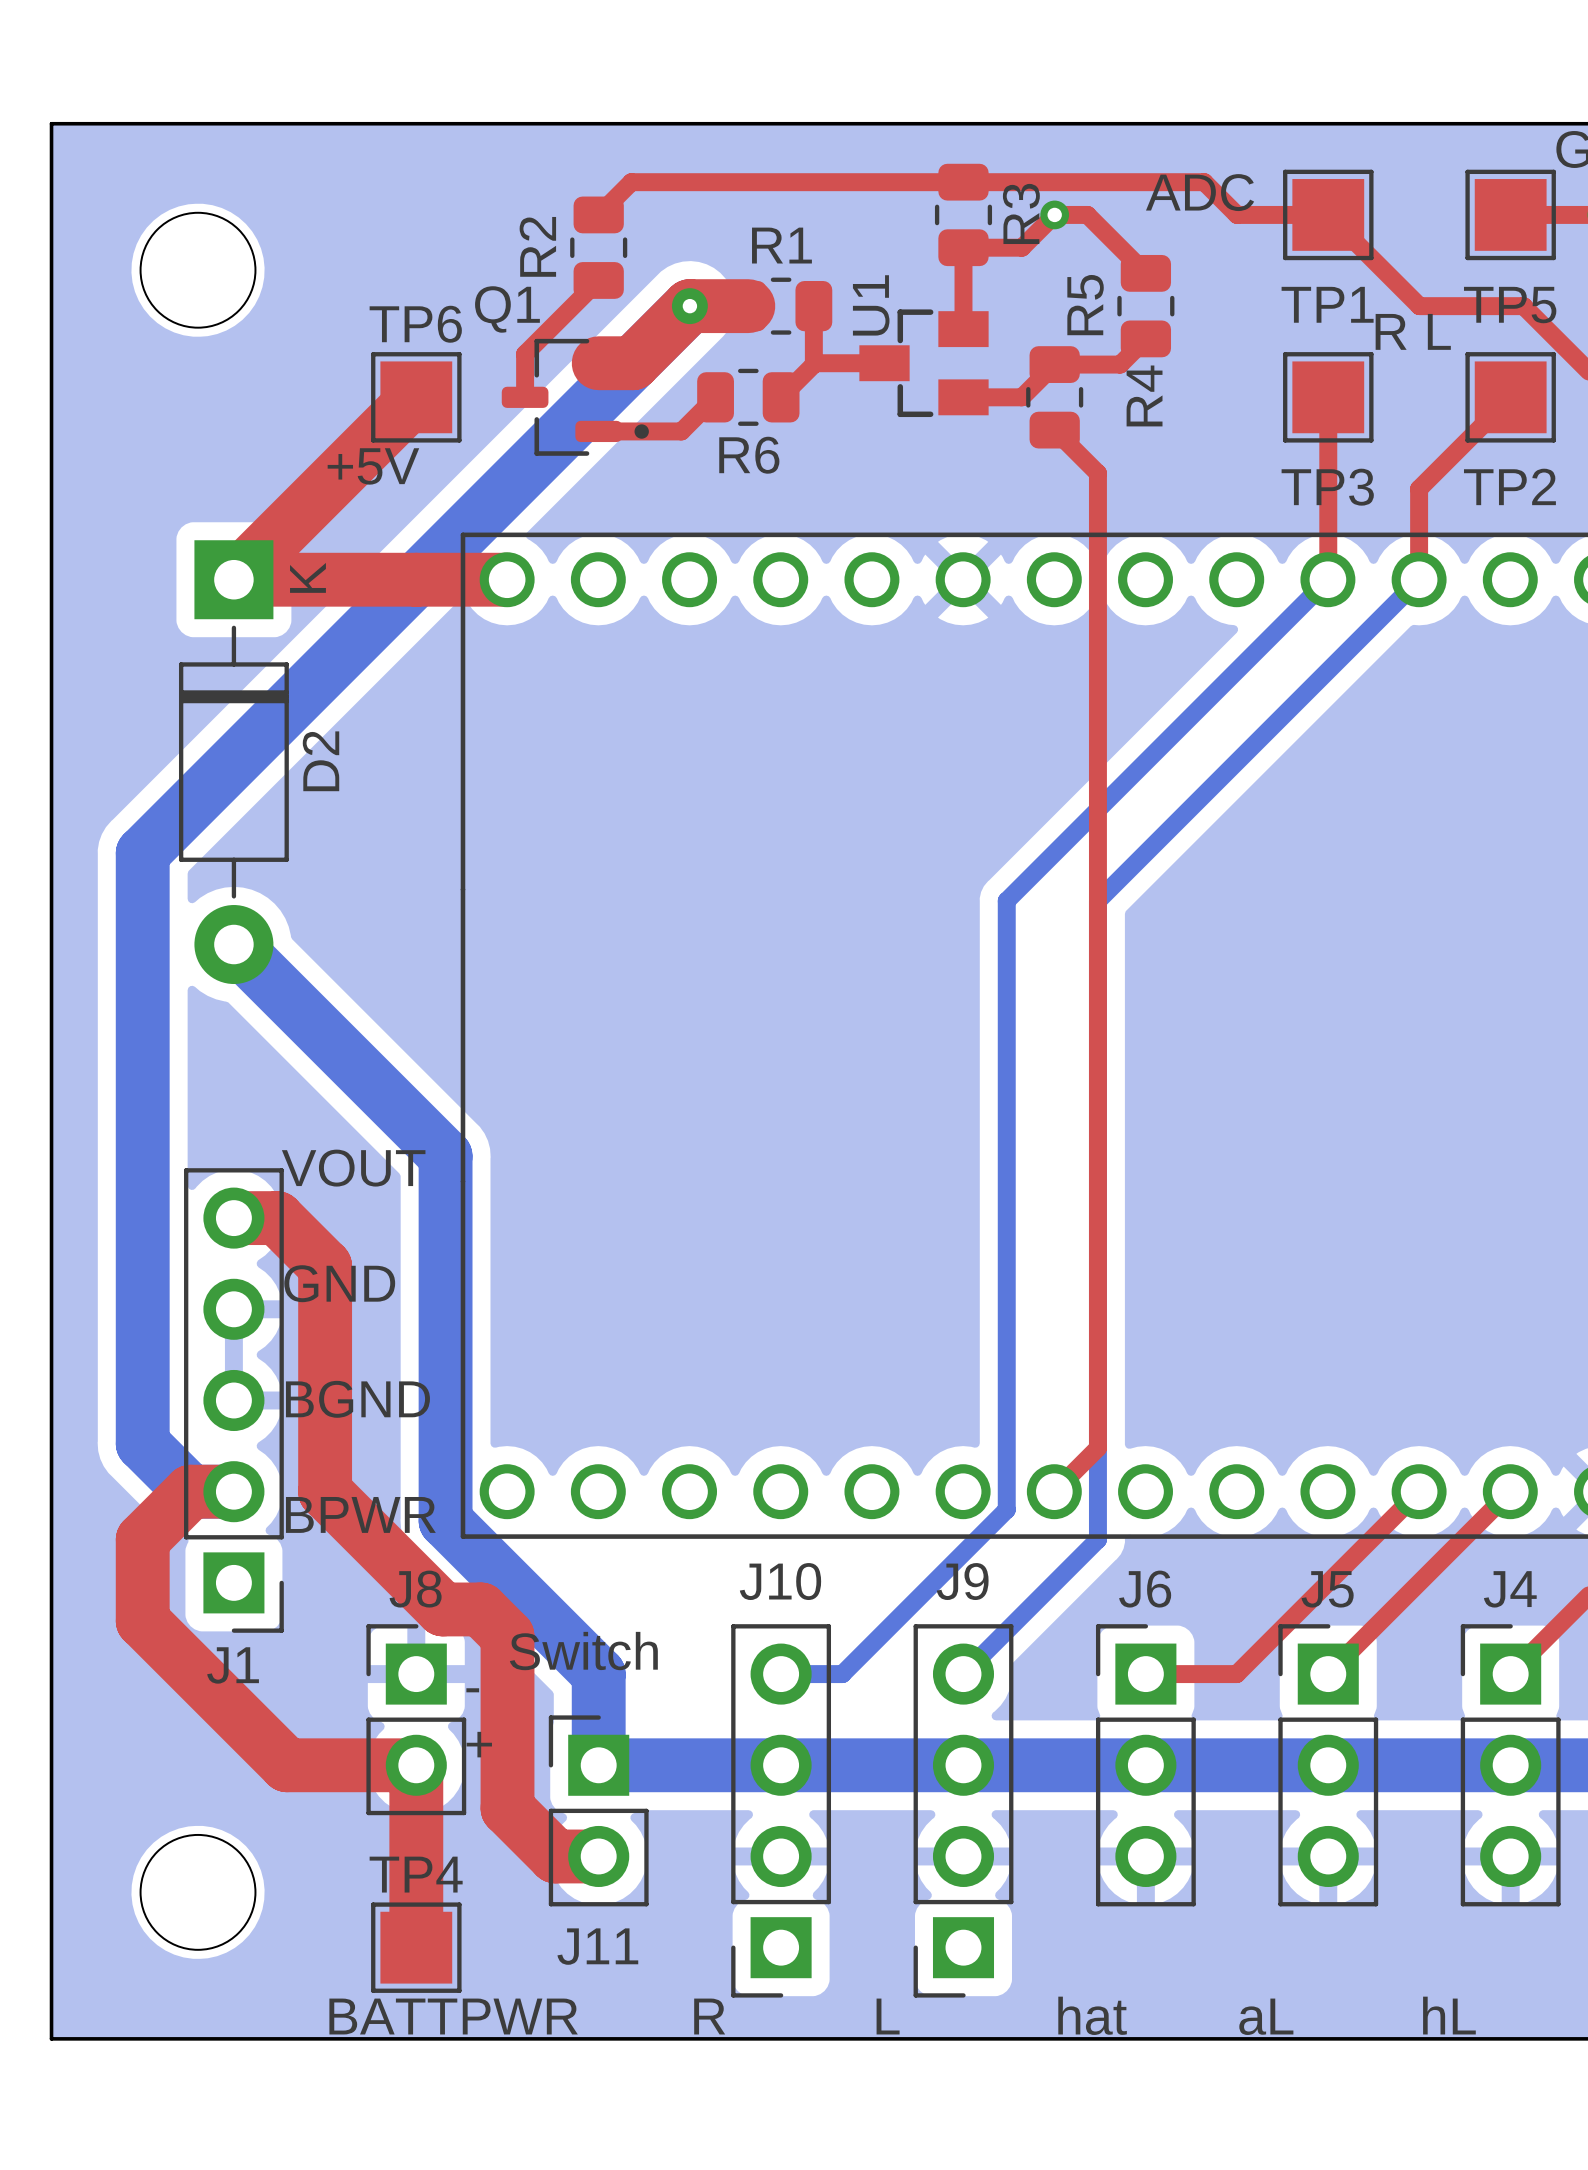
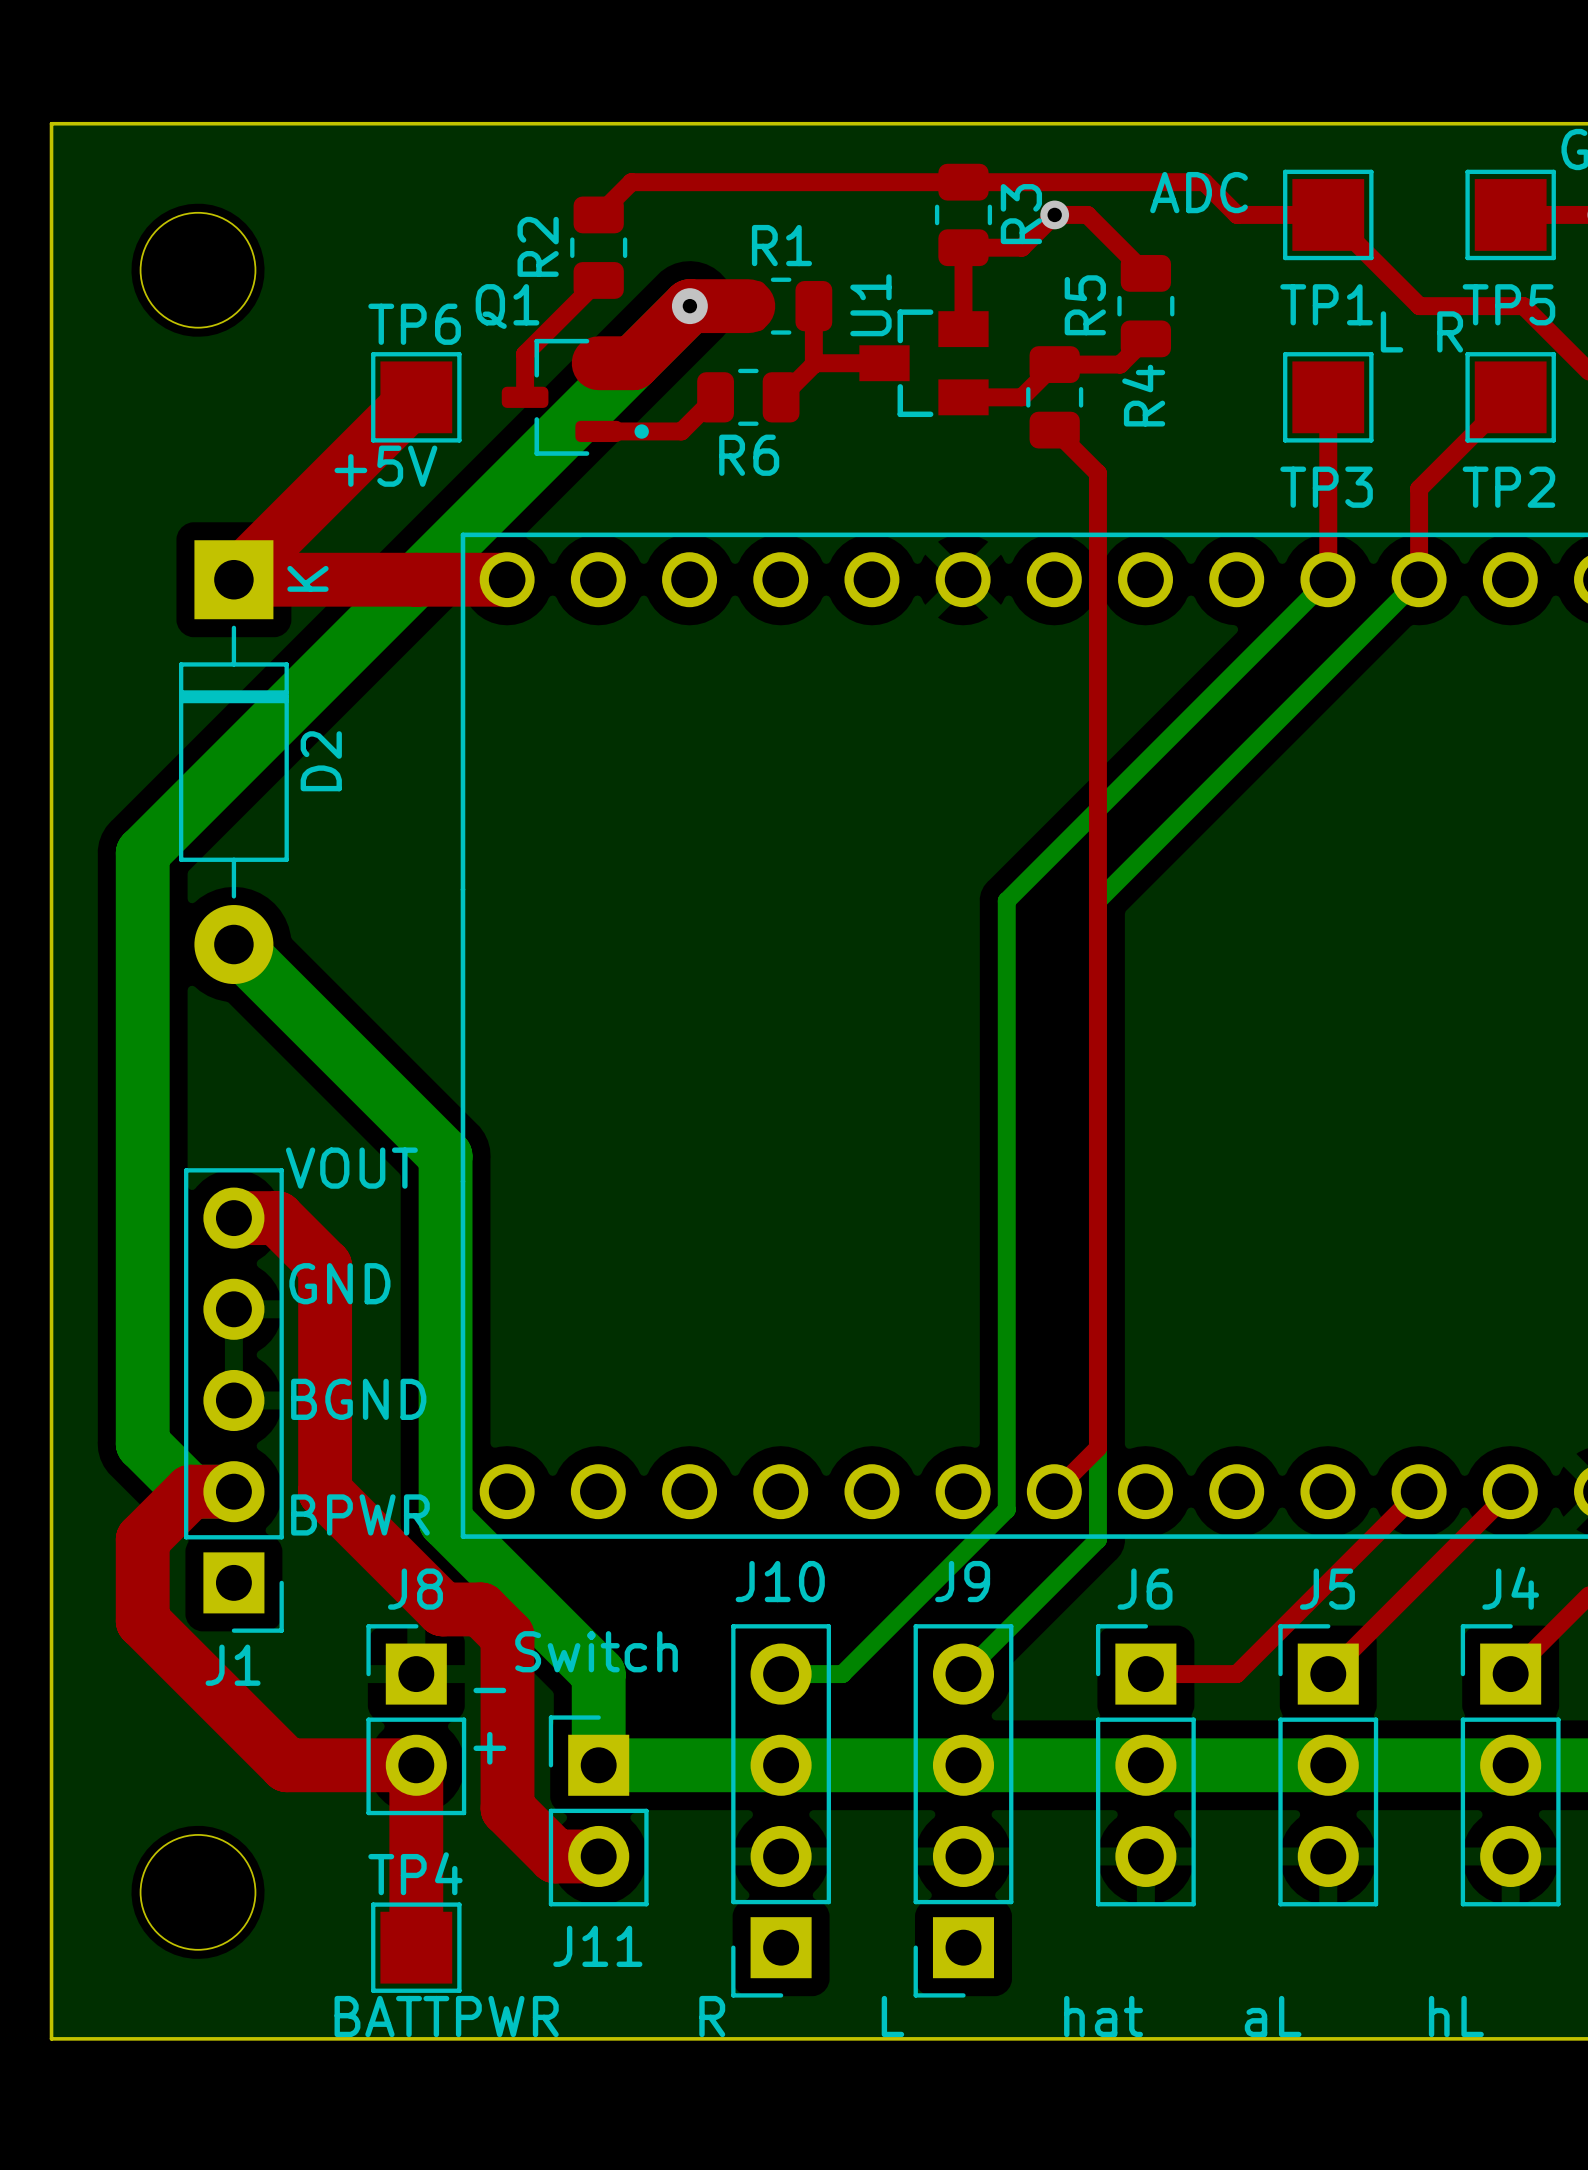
text: R L (1413, 331) -> L R (1421, 331)

